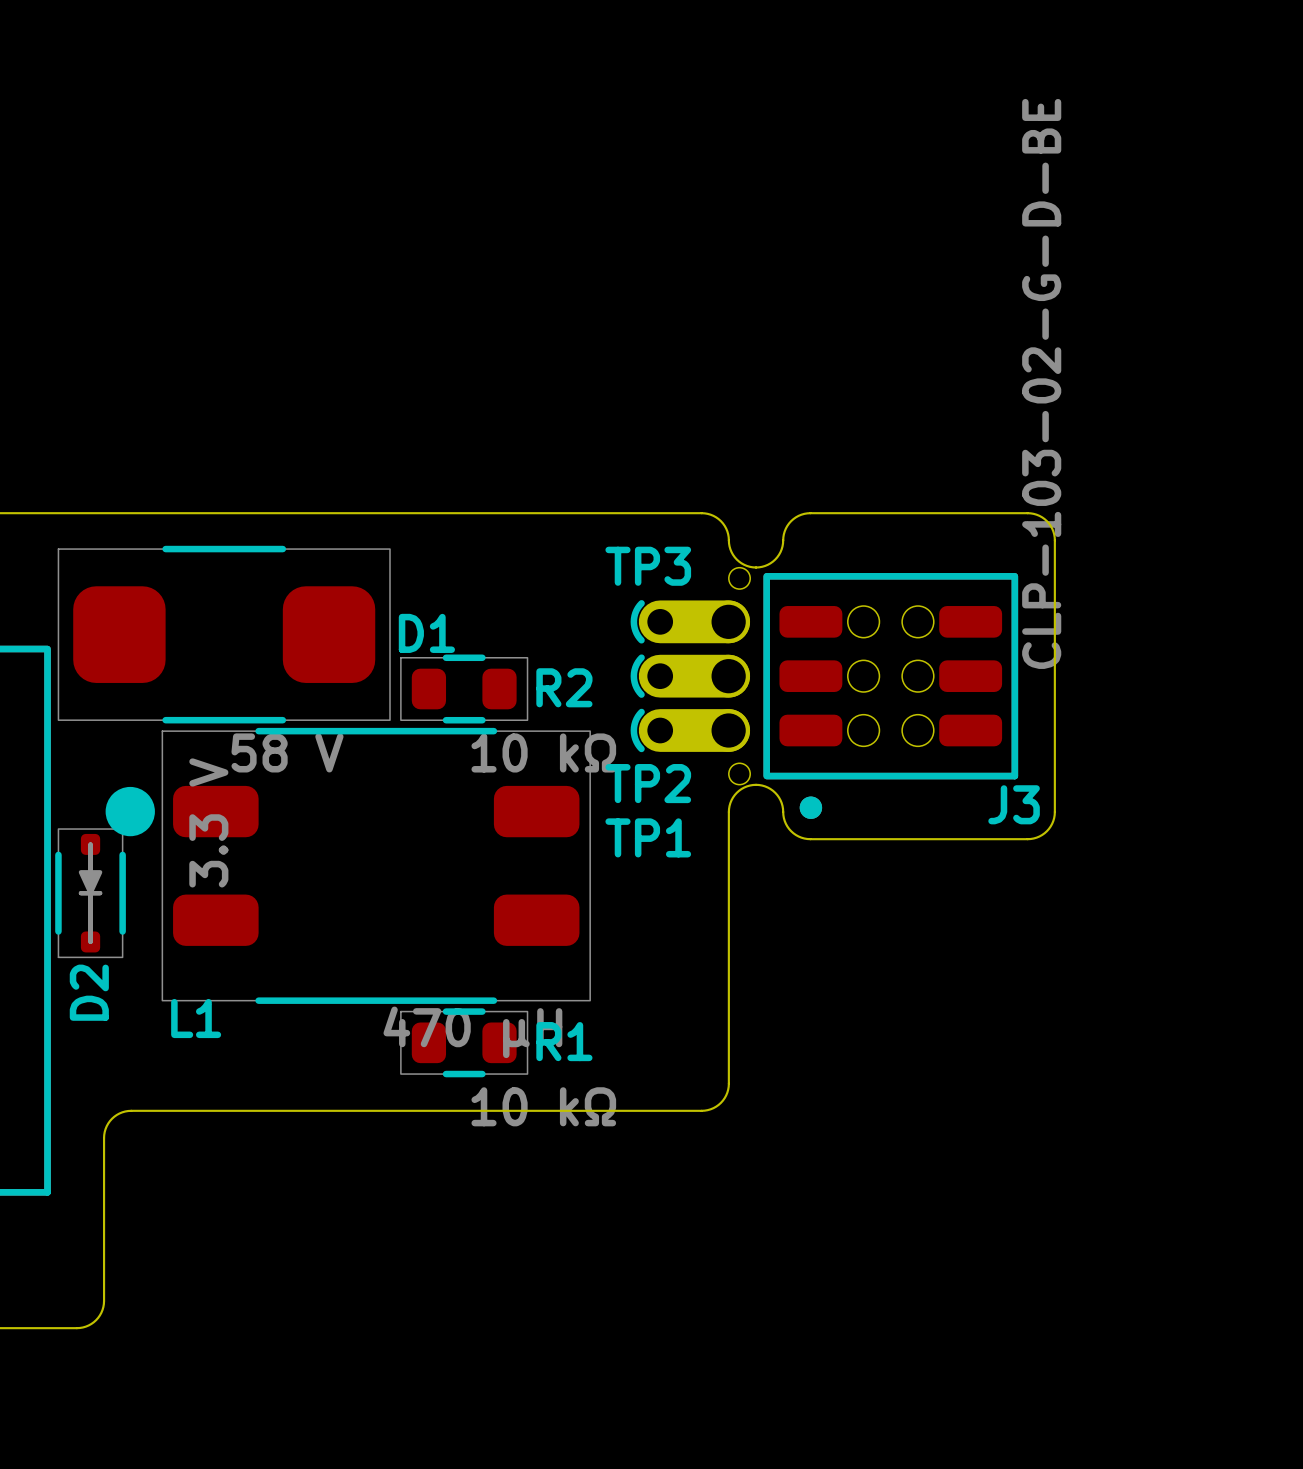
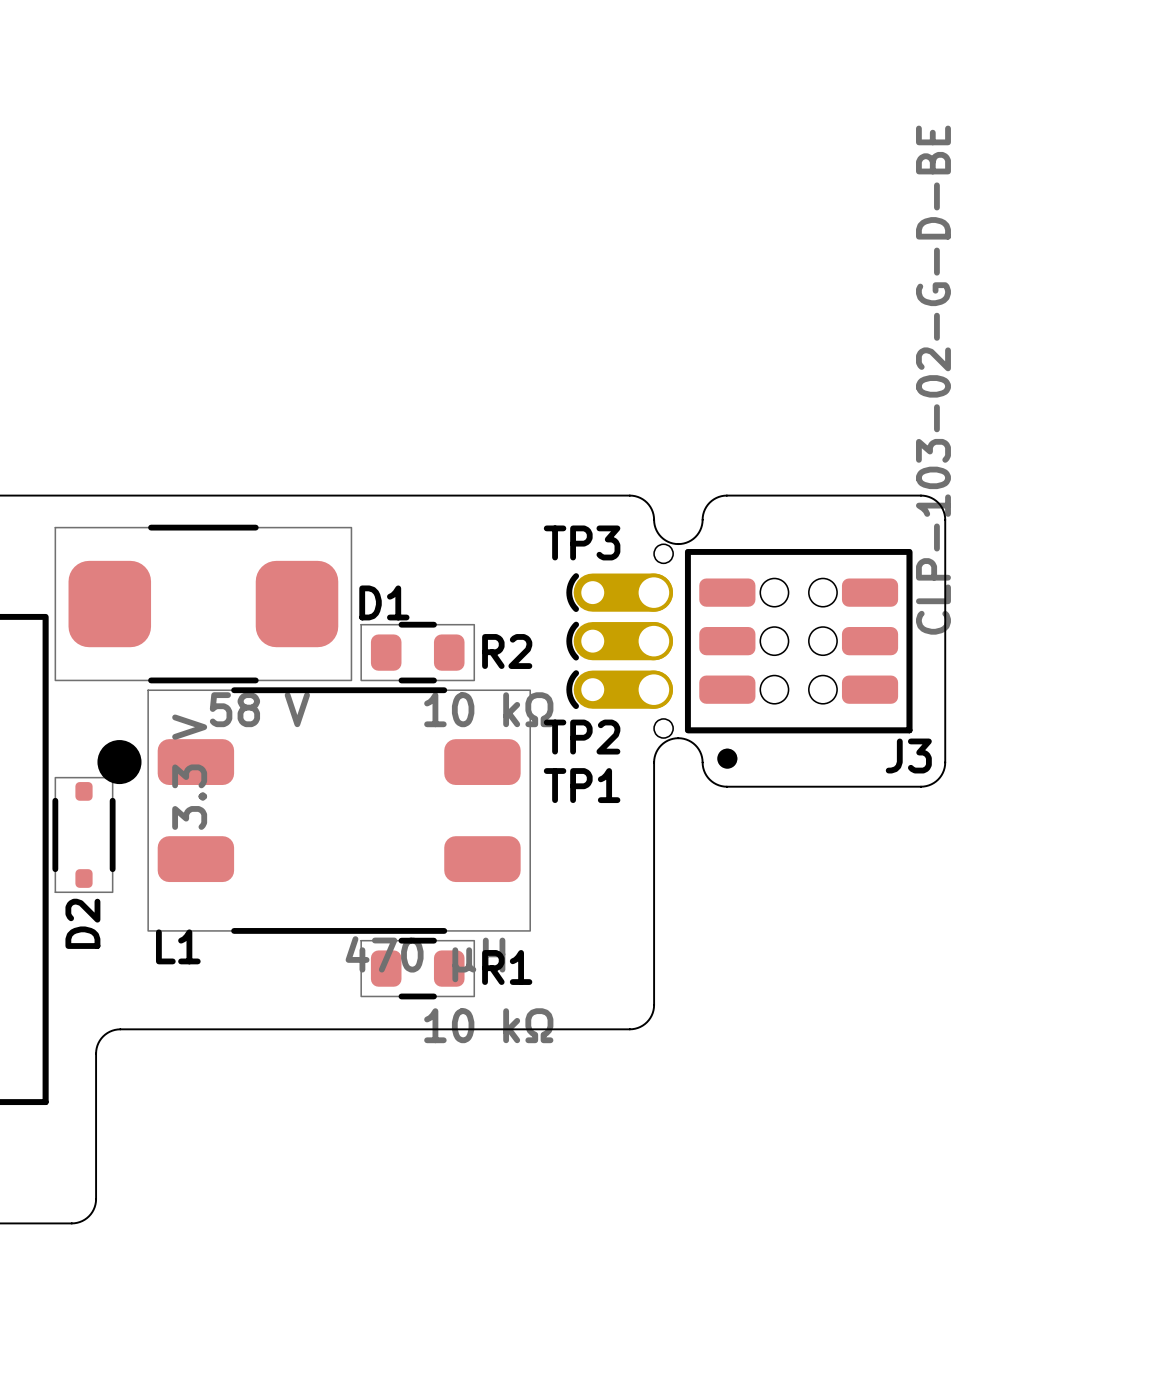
D2 footprint: [55, 828, 126, 958] -> [52, 777, 116, 893]

